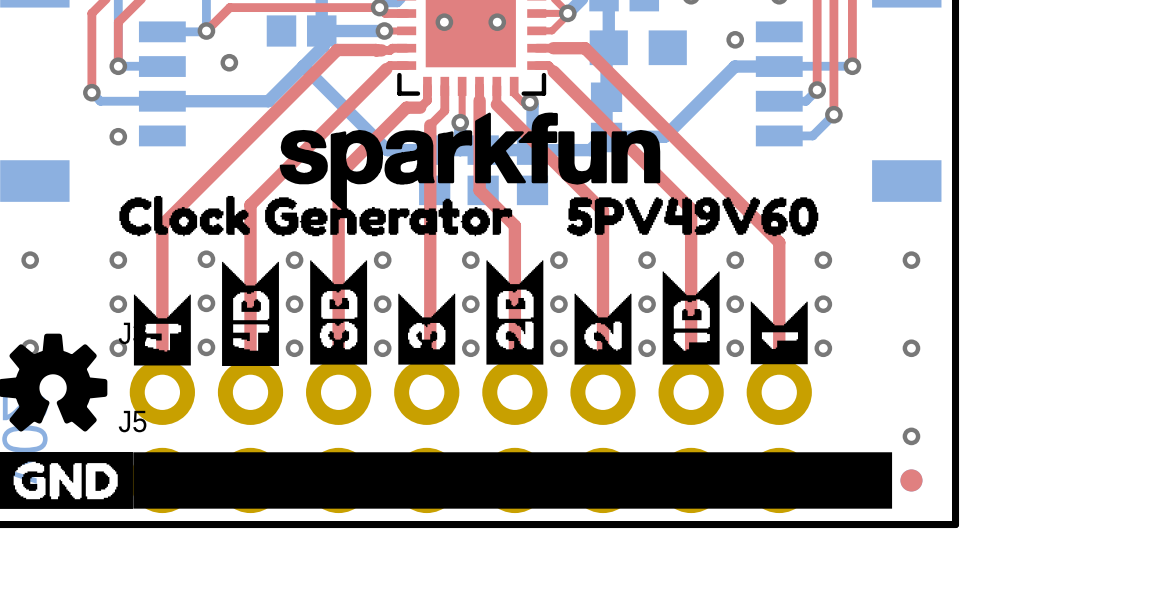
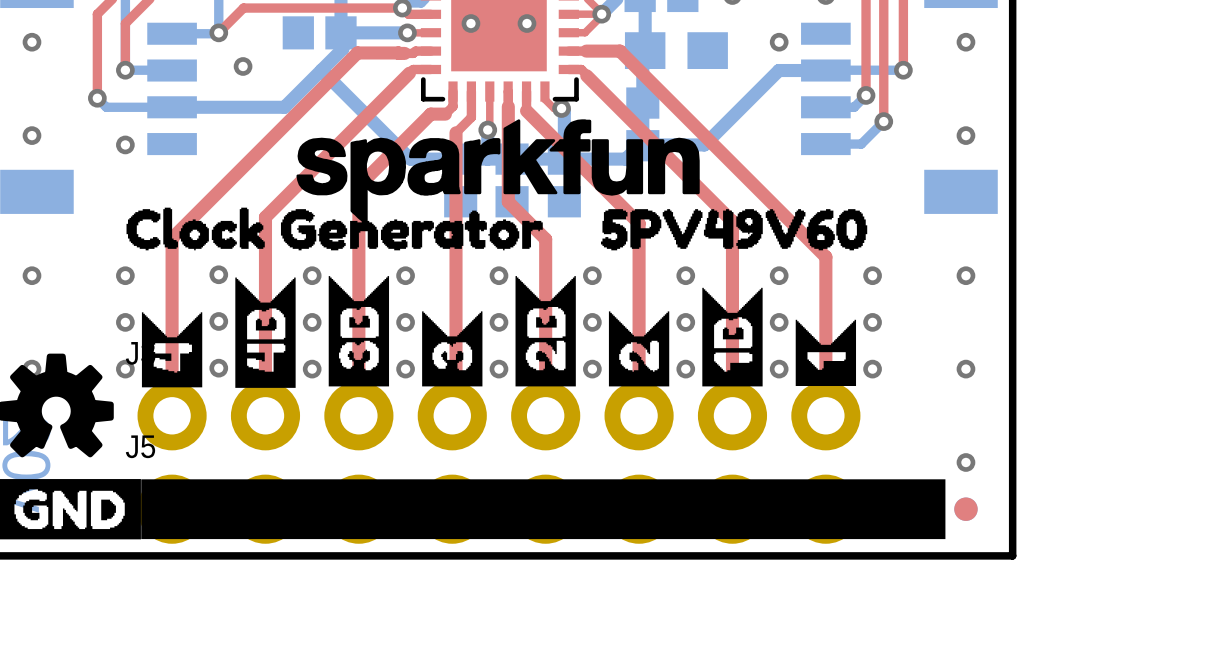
via: none -> (31, 42)
via: none -> (965, 42)
via: none -> (31, 135)
via: none -> (965, 135)

